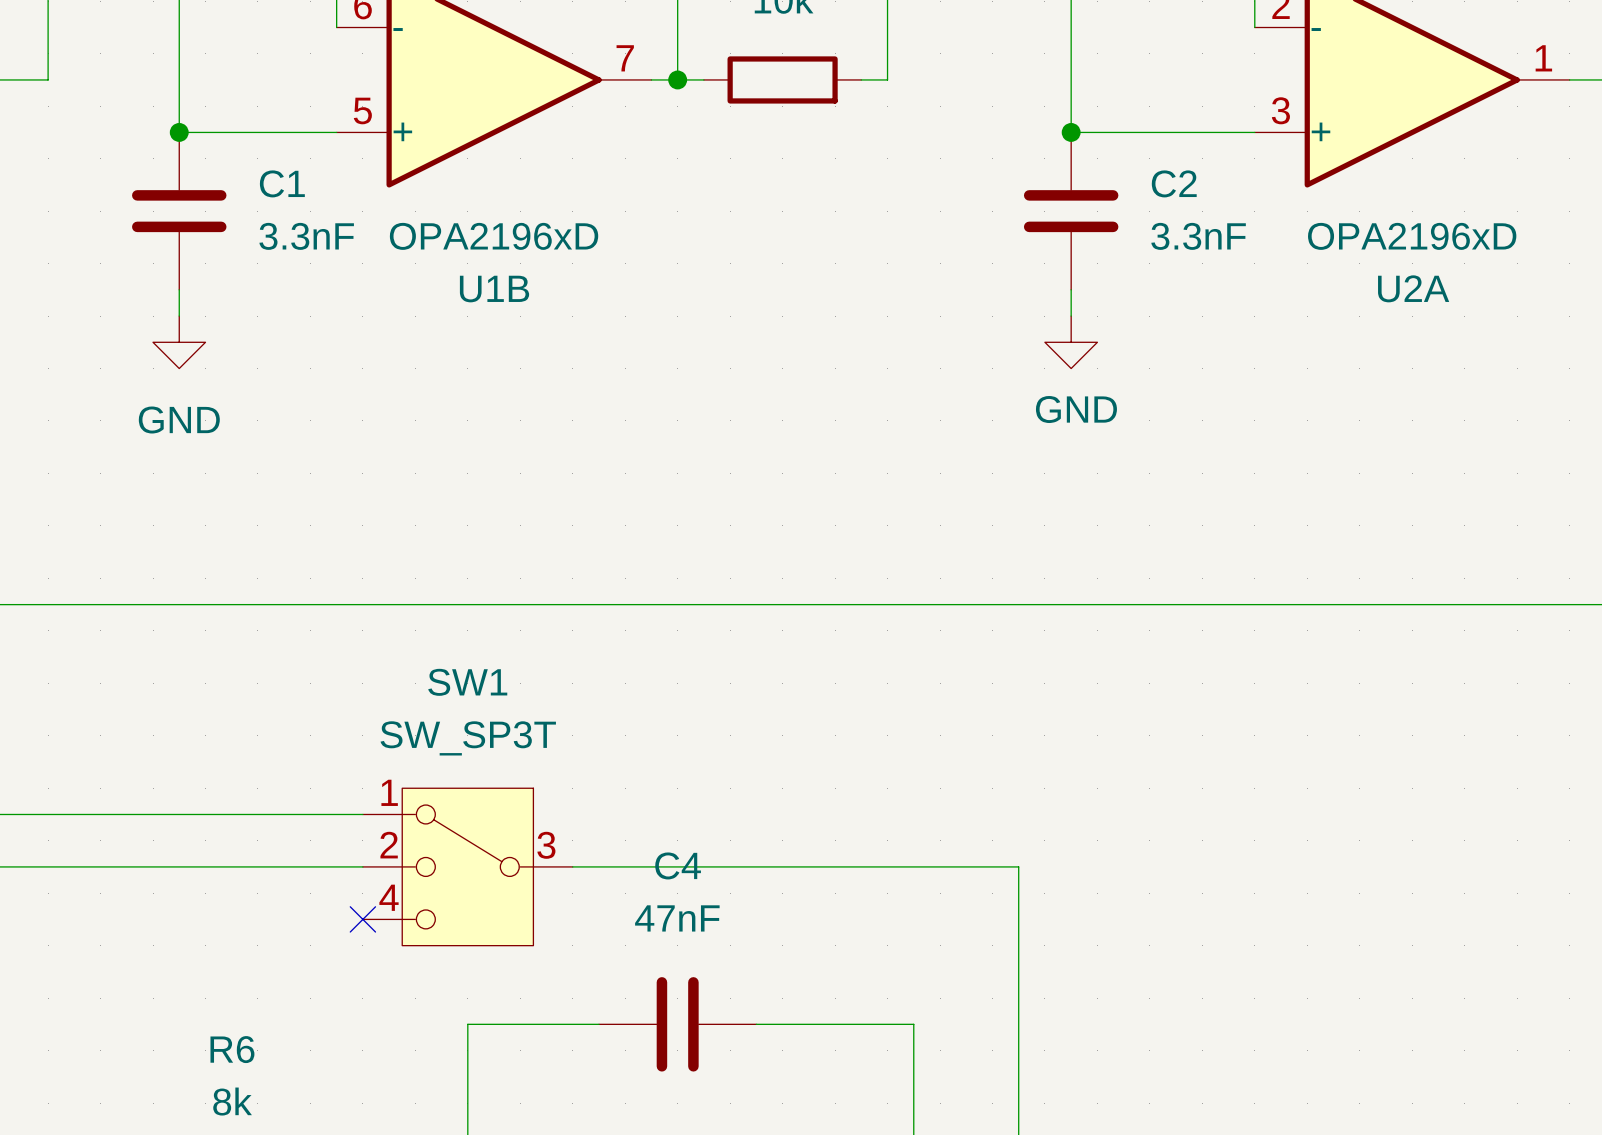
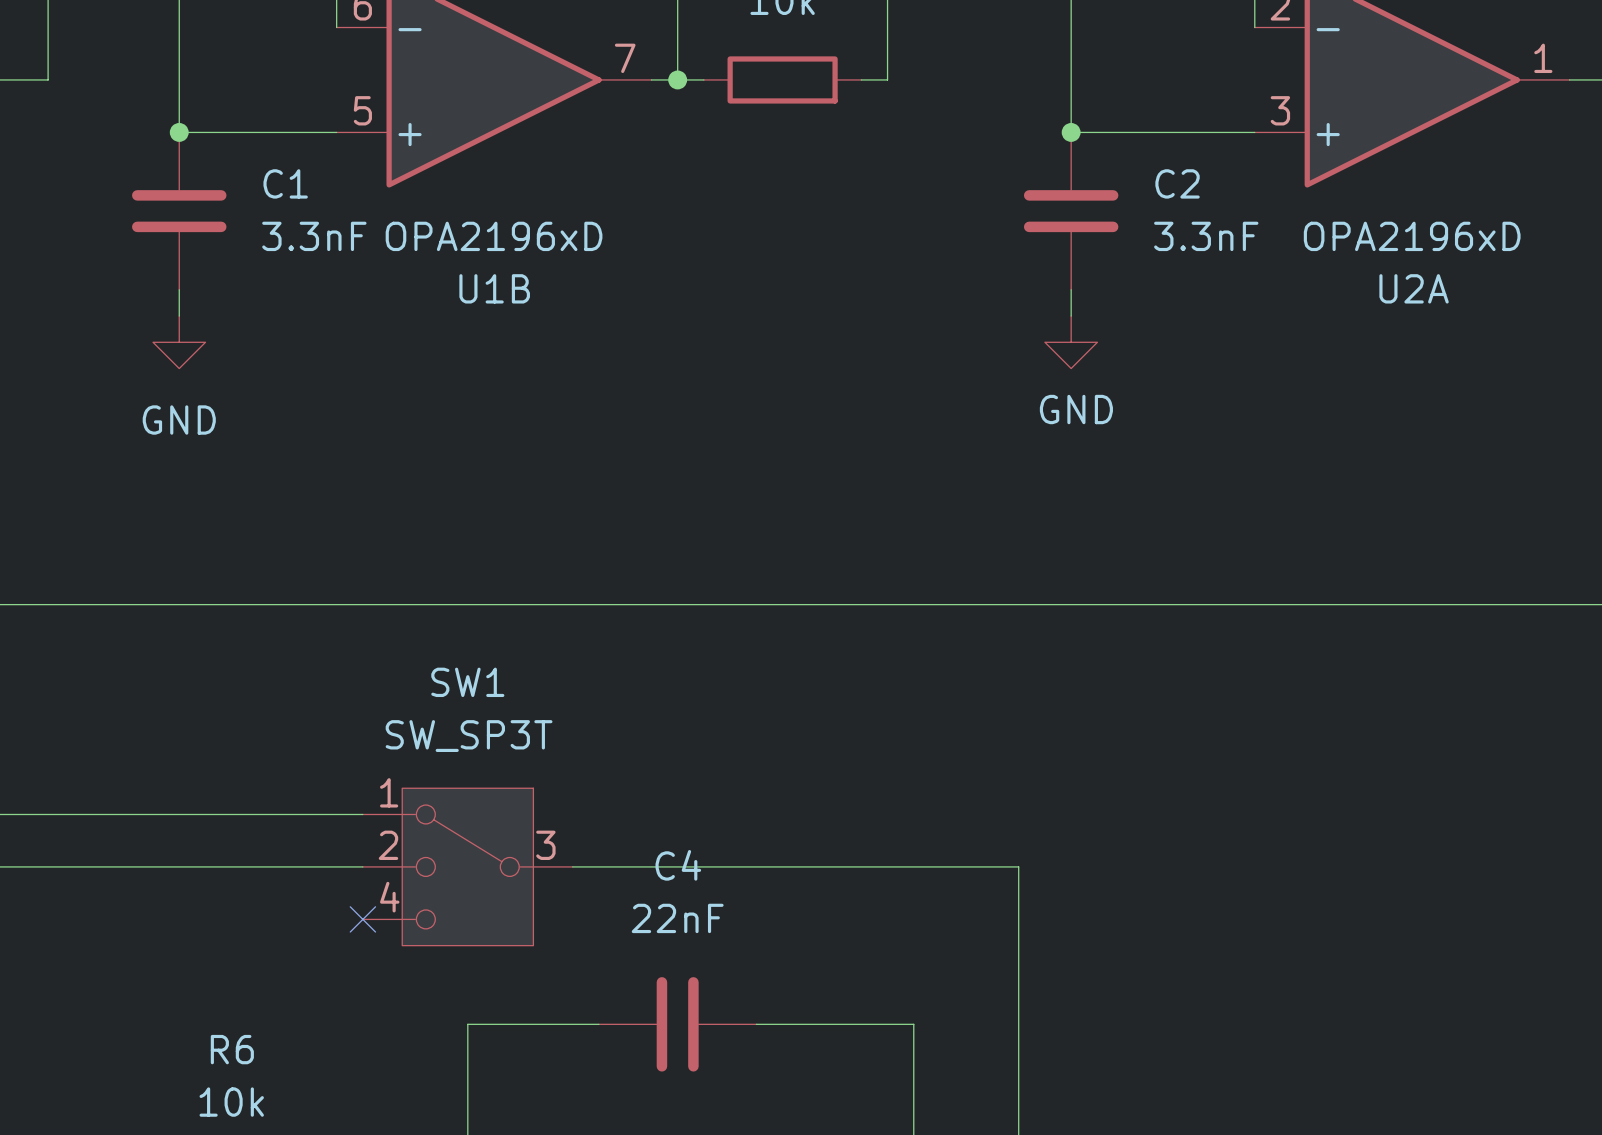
C4 value: 47nF (677, 918) -> 22nF (677, 918)
R6 value: 8k (232, 1101) -> 10k (231, 1102)

